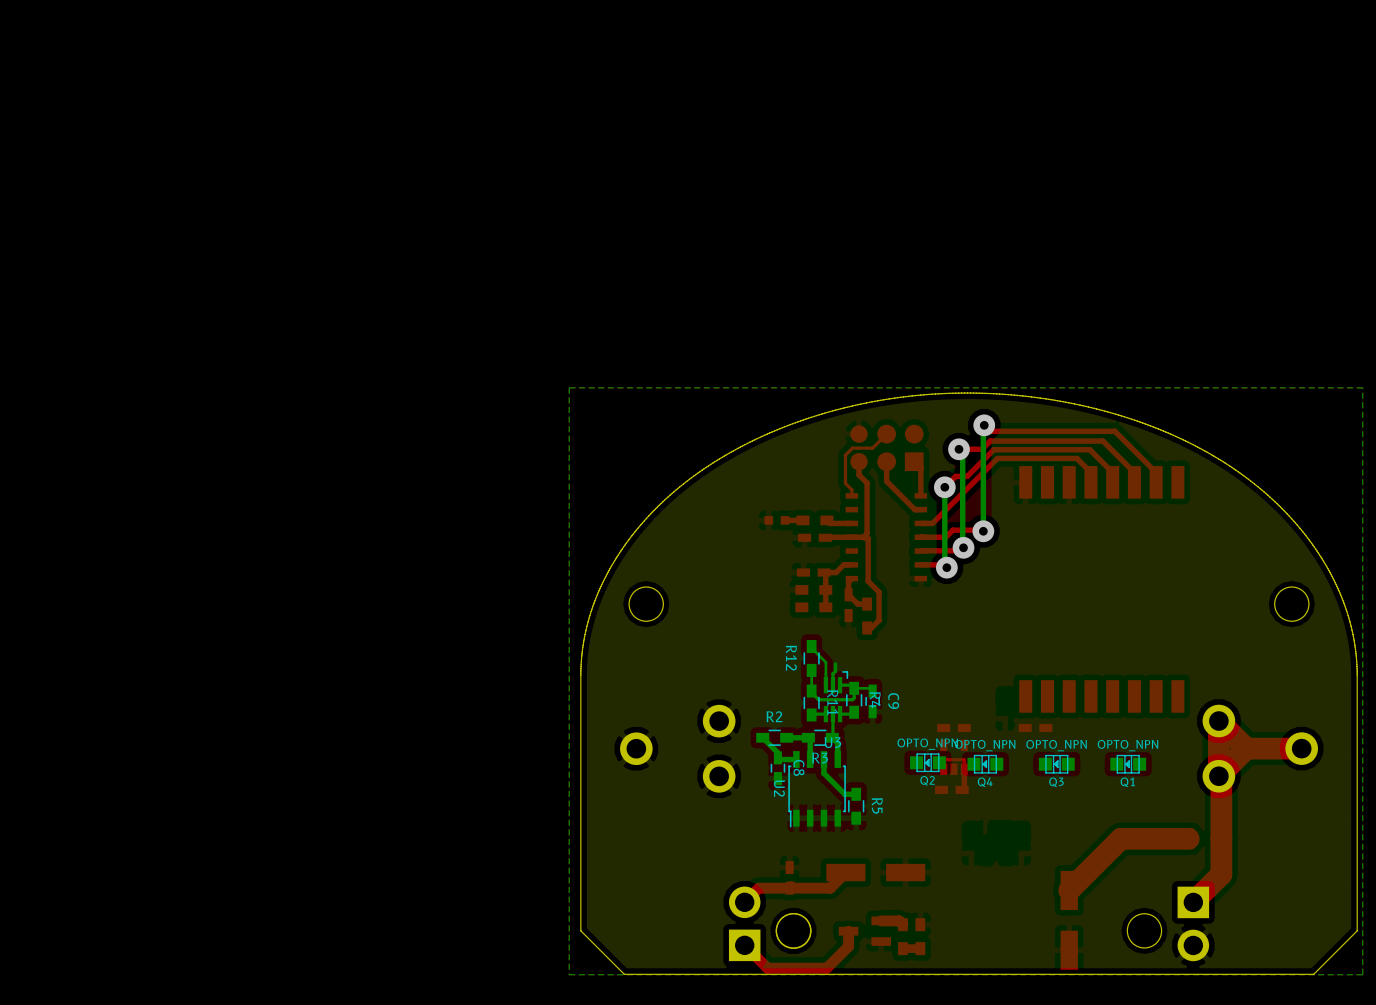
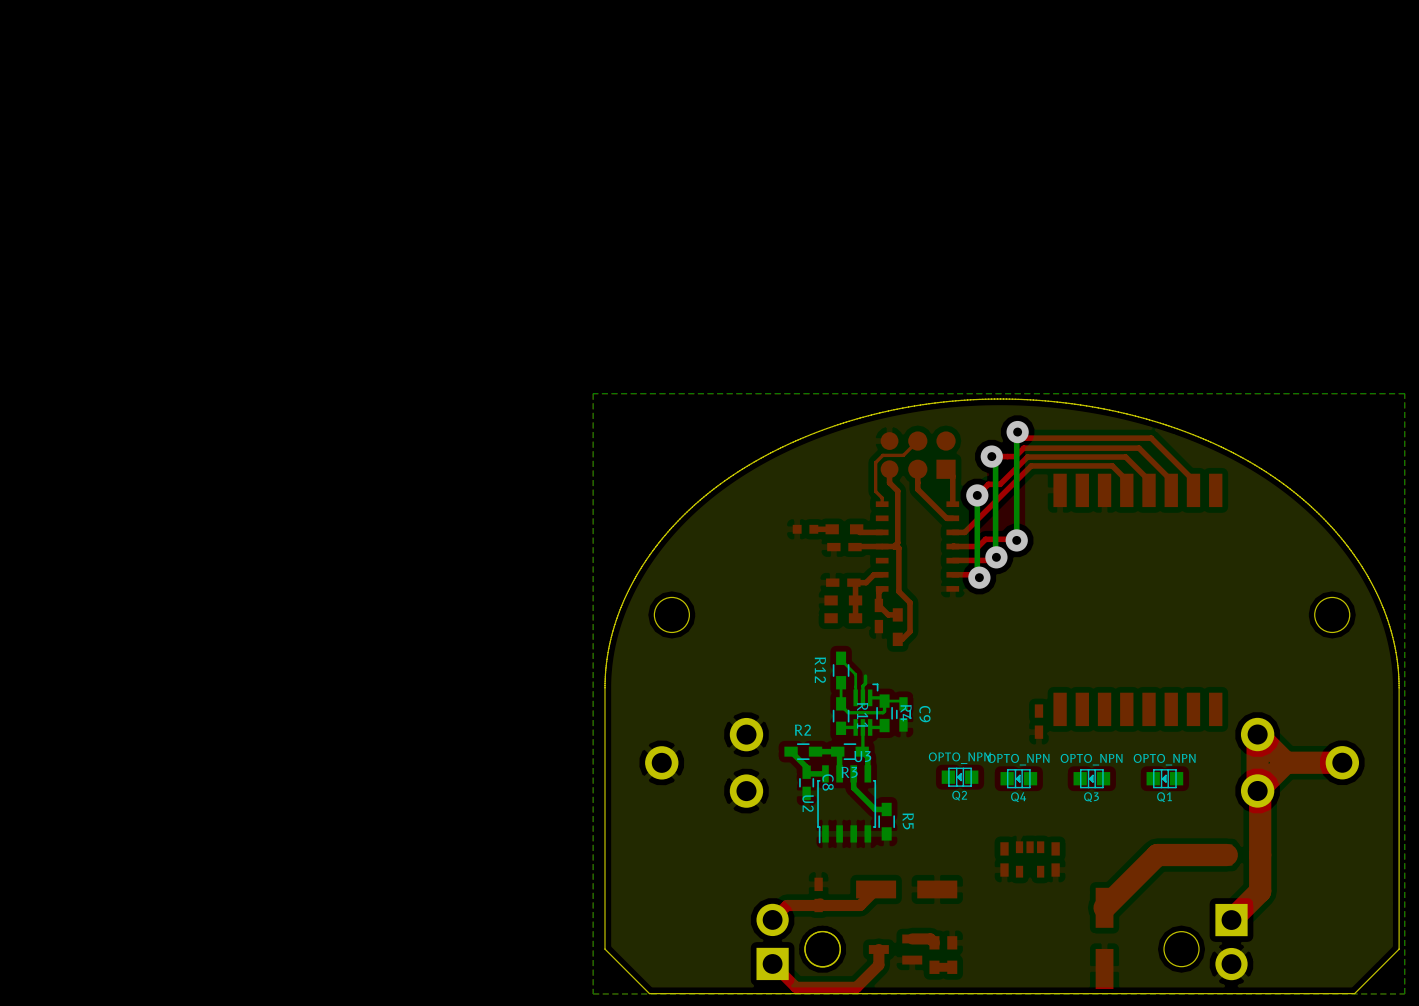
part: none -> (1038, 721)
part: (954, 727) -> none
part: (1035, 727) -> none
part rotation: 0° (954, 757) -> 180° (1030, 859)
part position: (954, 757) -> (1030, 859)
top track: (943, 769) (944, 759) (964, 760) (964, 787) (962, 789) -> none
part: (951, 789) -> none
part: none -> (1004, 859)
part: none -> (1055, 859)

